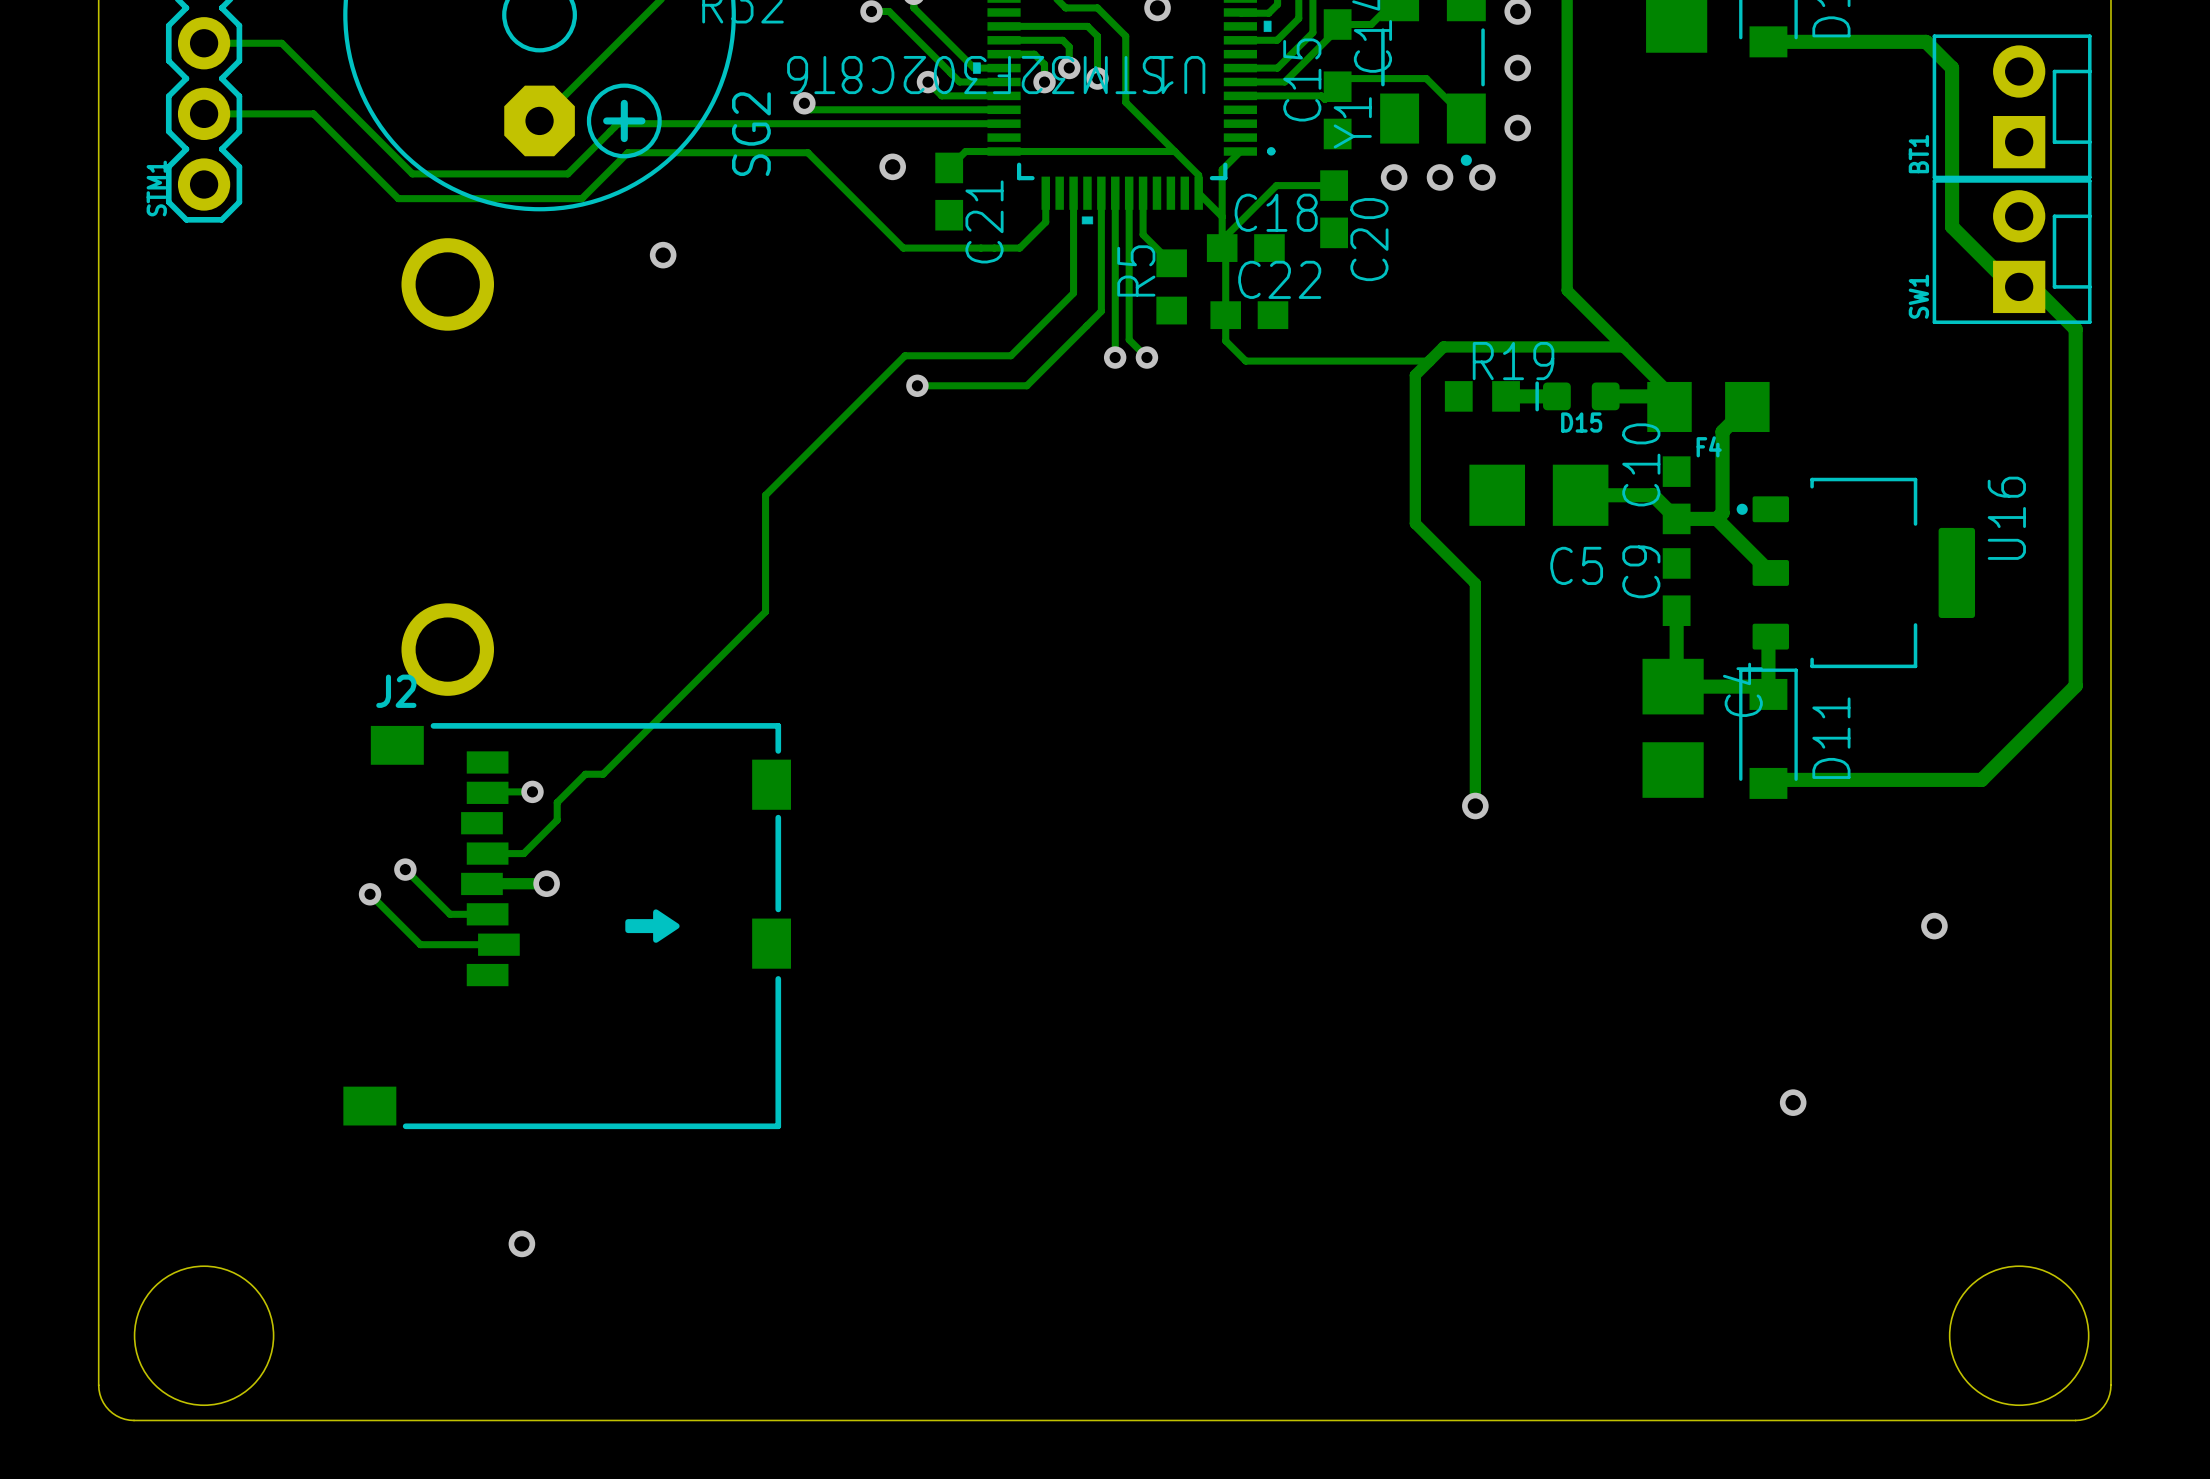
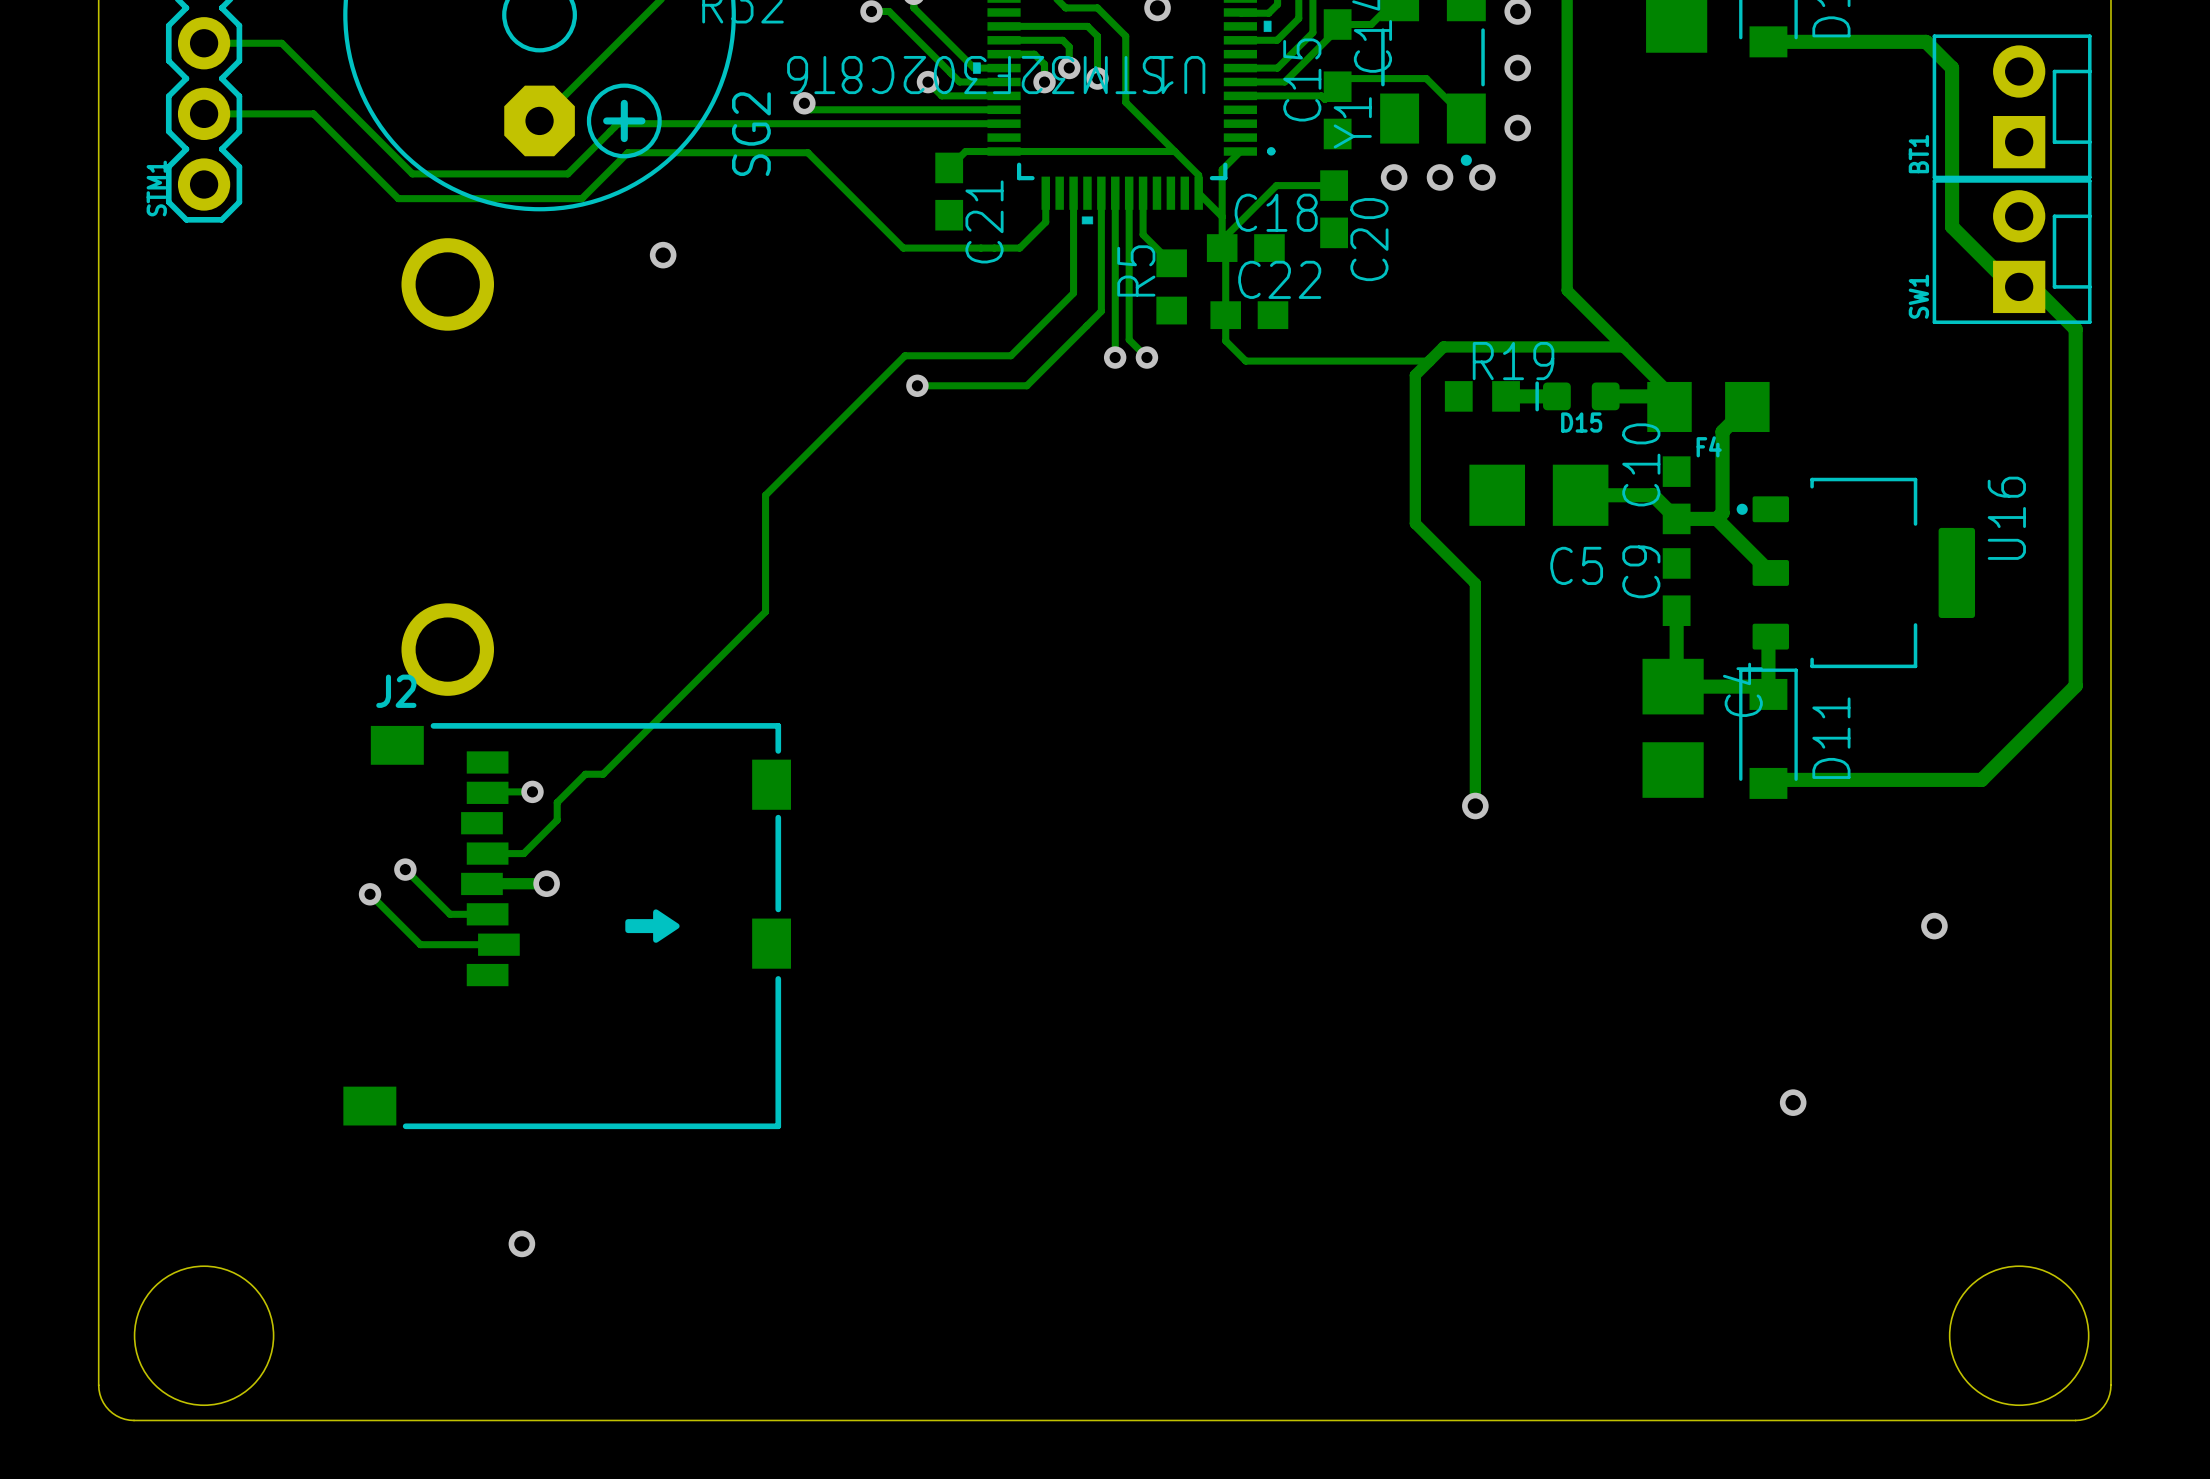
via: (892, 166) -> none

